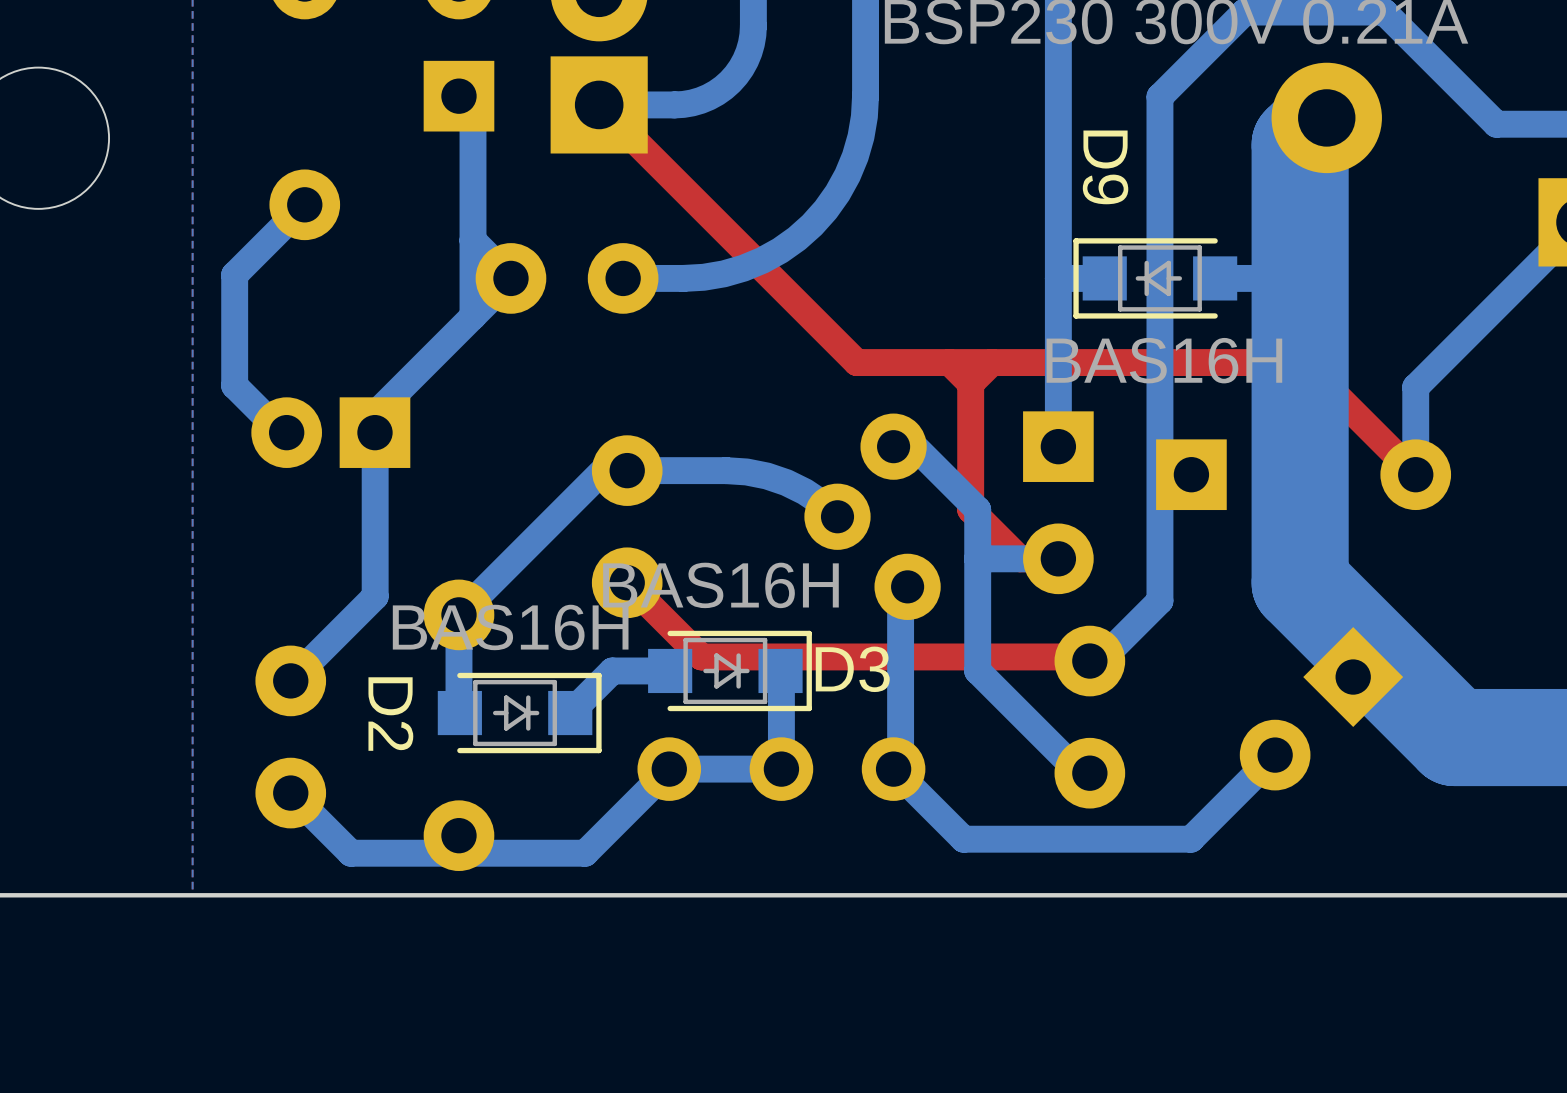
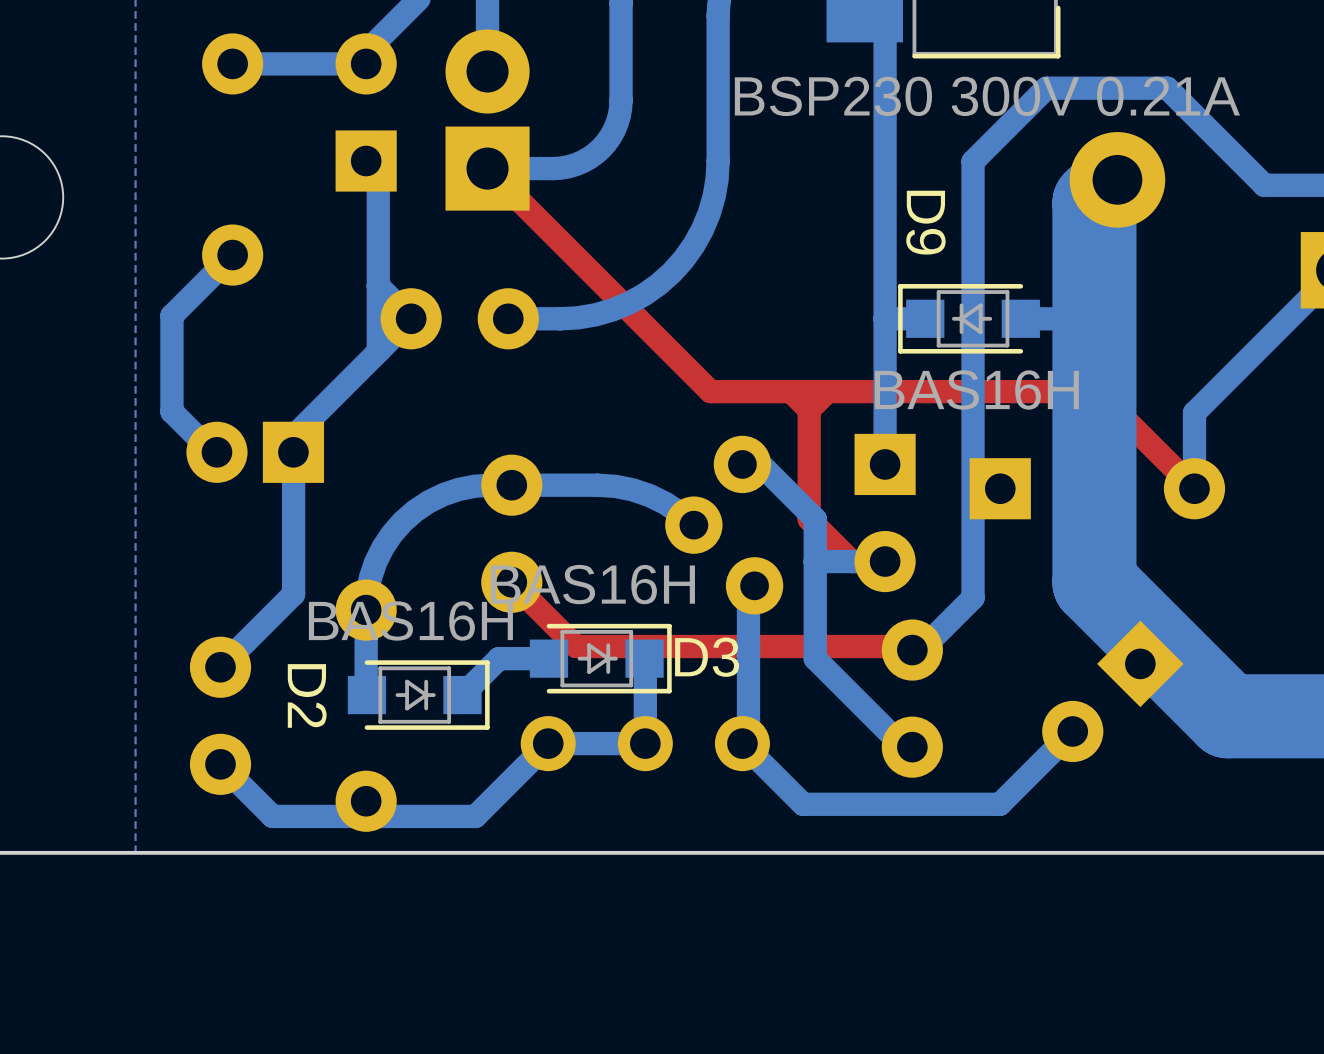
bottom track: (613, 460) (458, 614) -> (511, 485) (474, 486) (458, 489) (428, 501) (415, 511) (391, 534) (375, 562) (367, 593) (366, 610)

